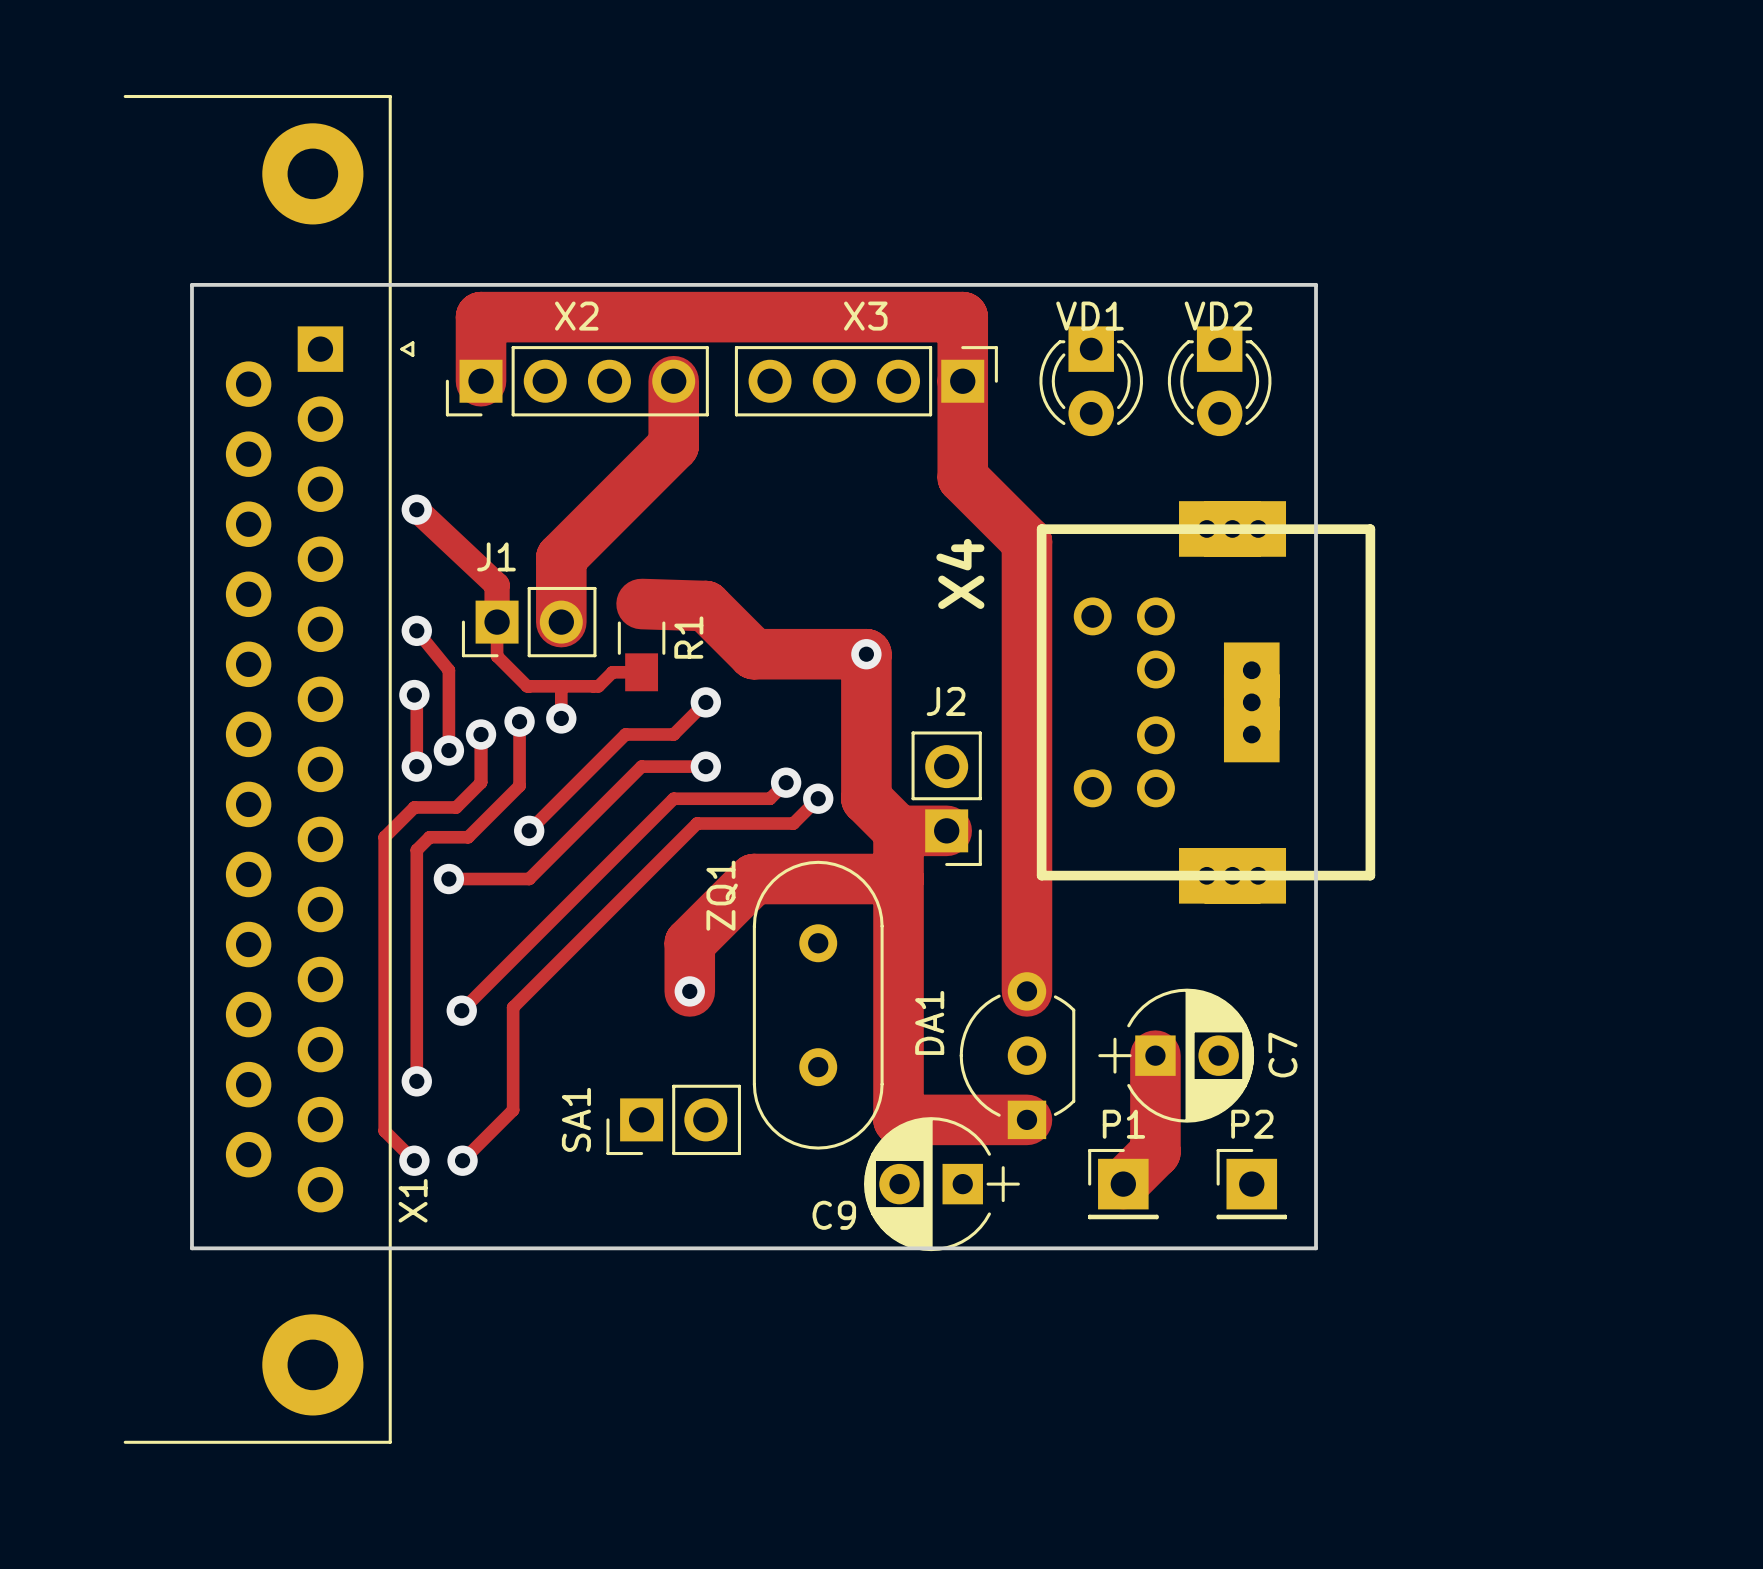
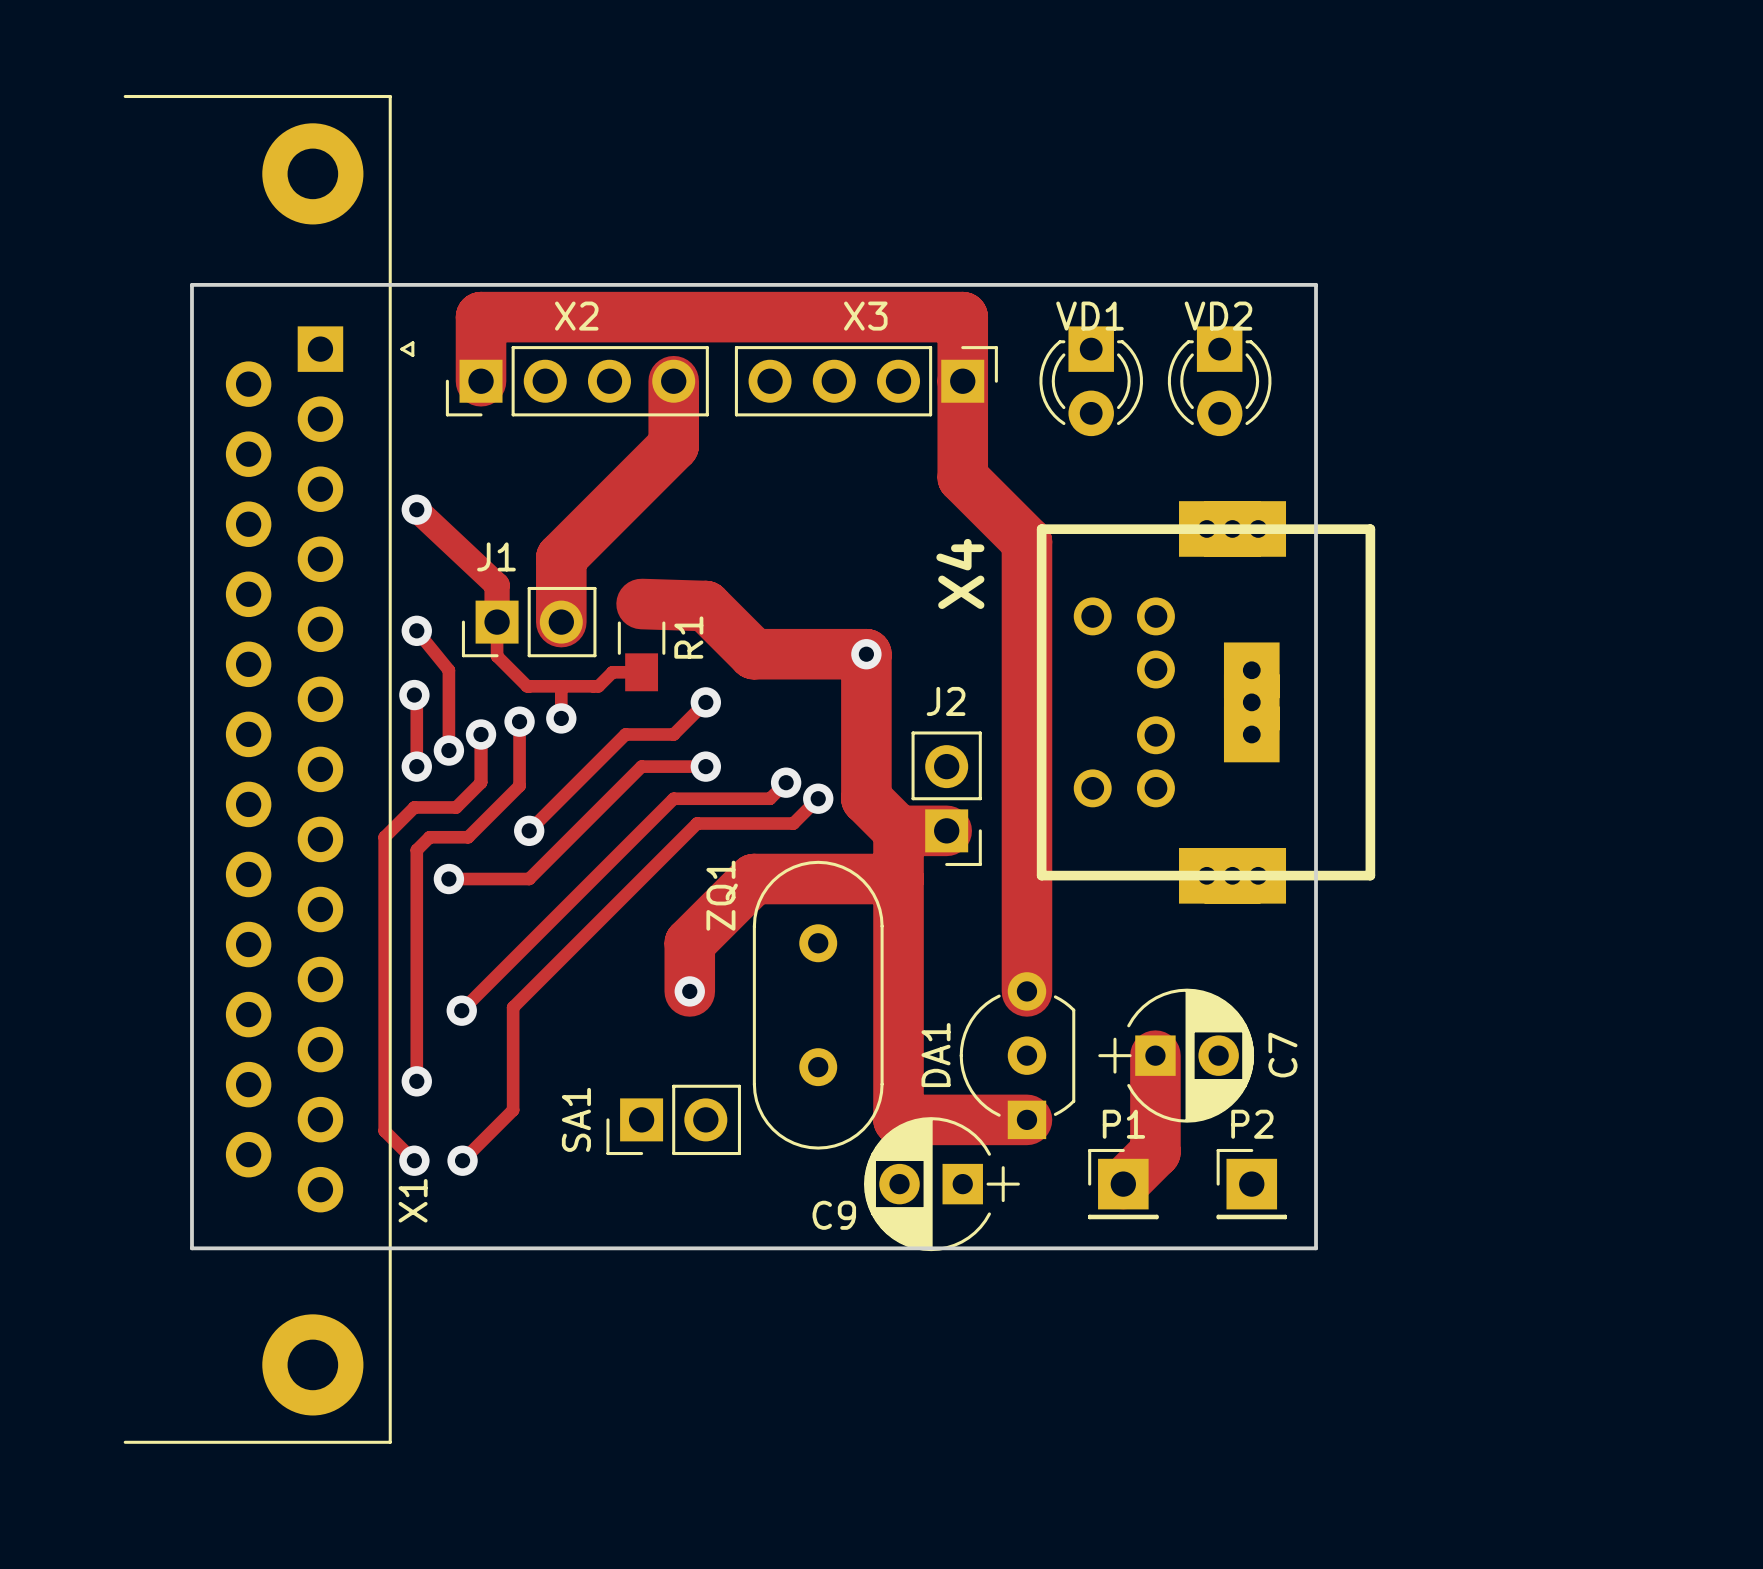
DA1 name position: DA1 (929, 1022) -> DA1 (936, 1055)

